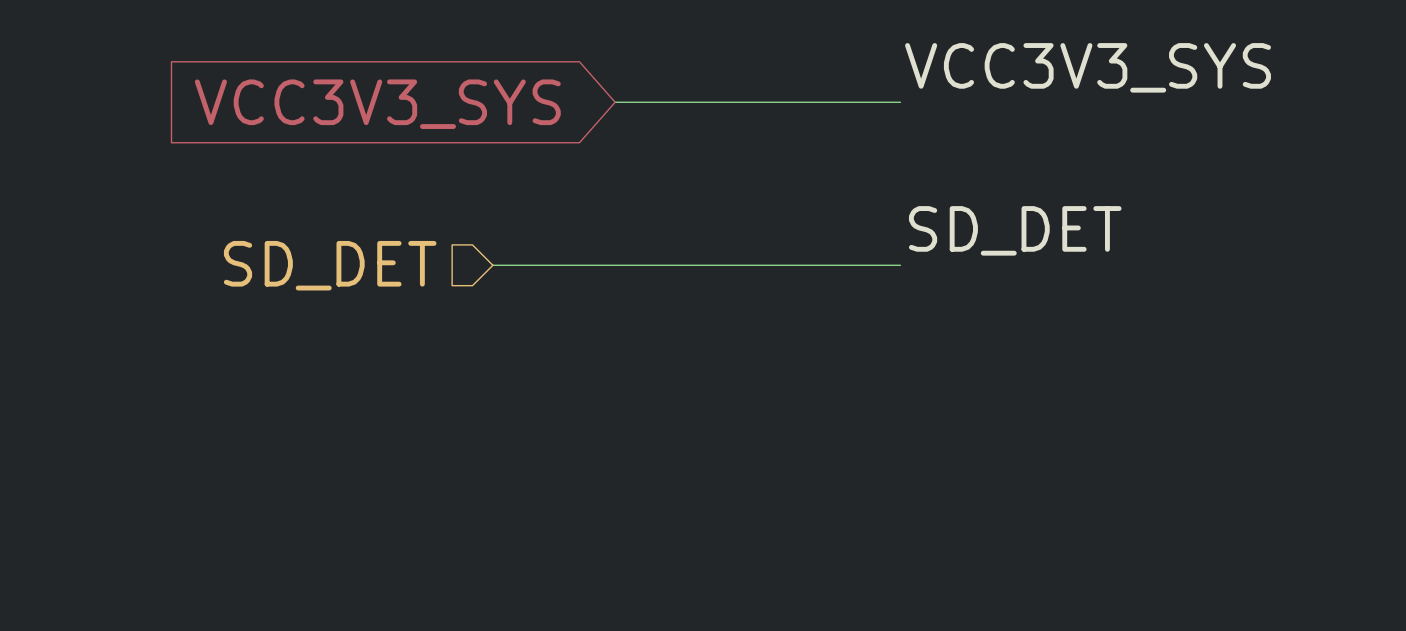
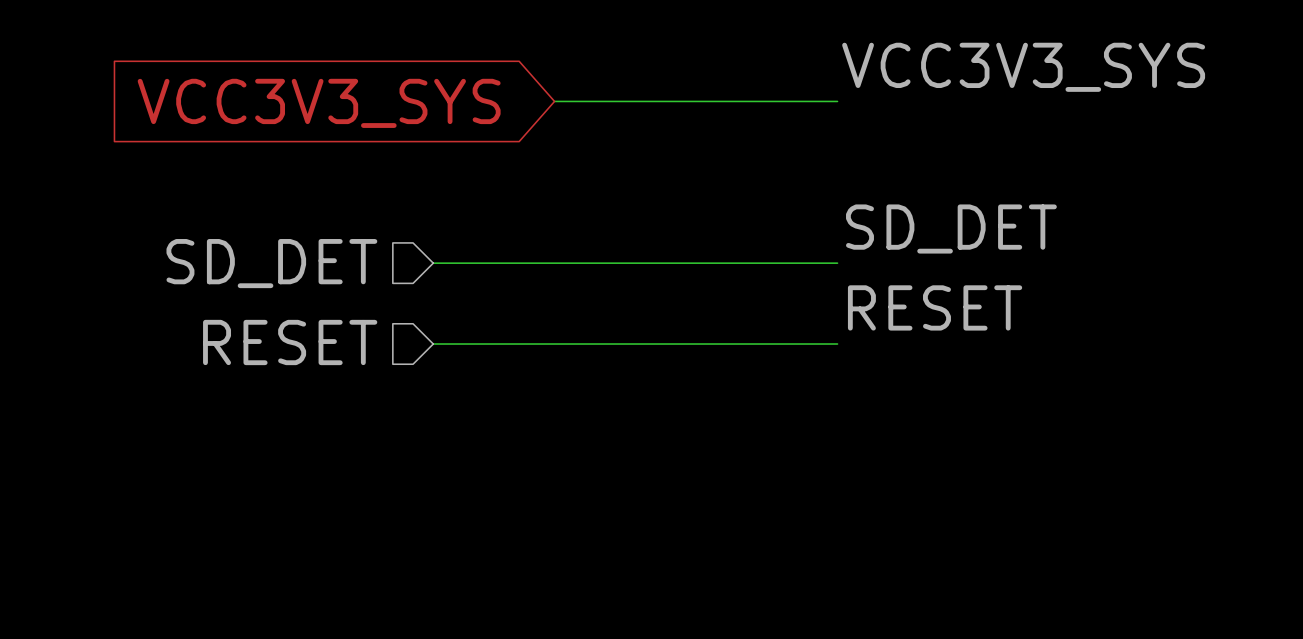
label: none -> RESET (935, 307)
hierarchical label: none -> RESET (290, 342)
wire: none -> (433, 344) (837, 344)

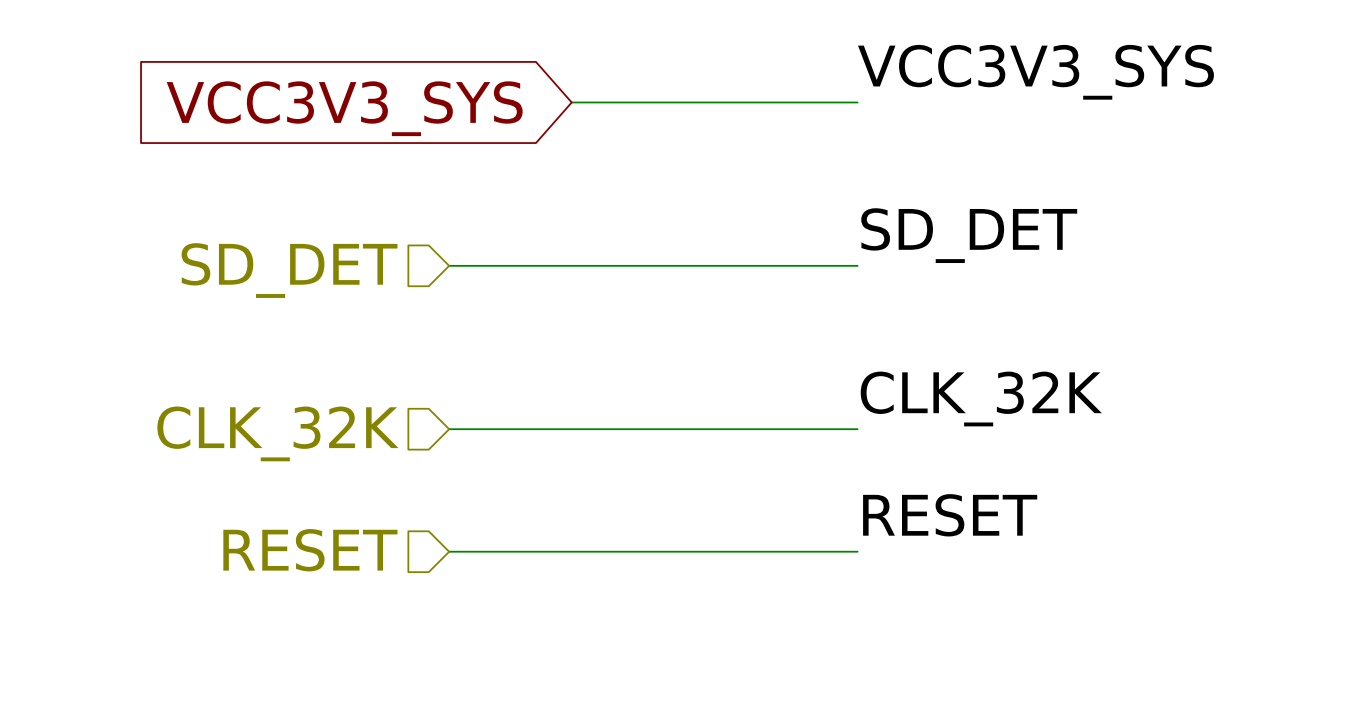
label position: RESET (935, 307) -> RESET (950, 515)
hierarchical label position: RESET (290, 342) -> RESET (310, 550)
wire: (433, 344) (837, 344) -> (449, 429) (857, 429)
label: none -> CLK_32K (981, 398)
hierarchical label: none -> CLK_32K (277, 433)
wire: none -> (449, 551) (857, 551)

